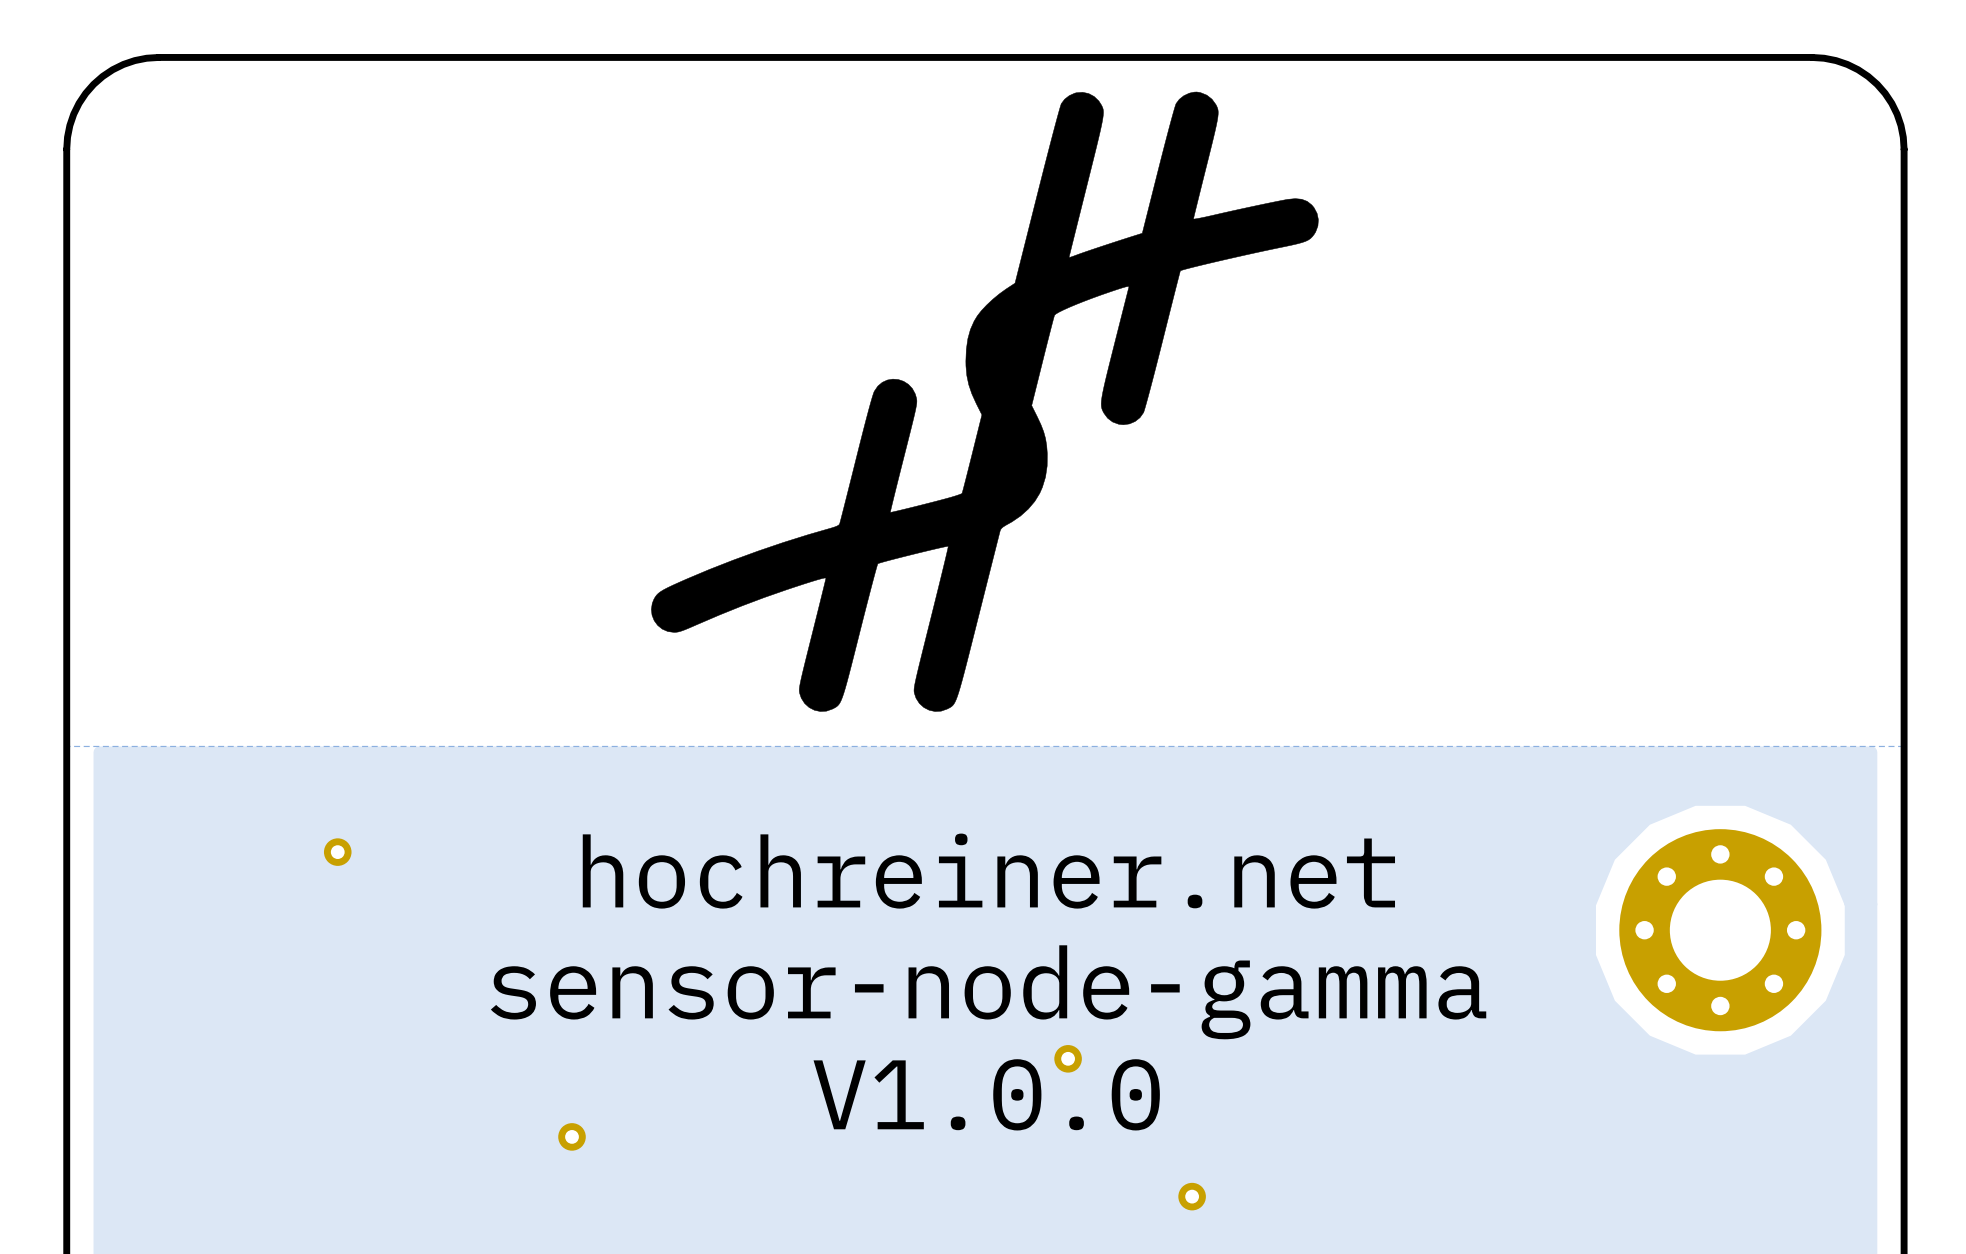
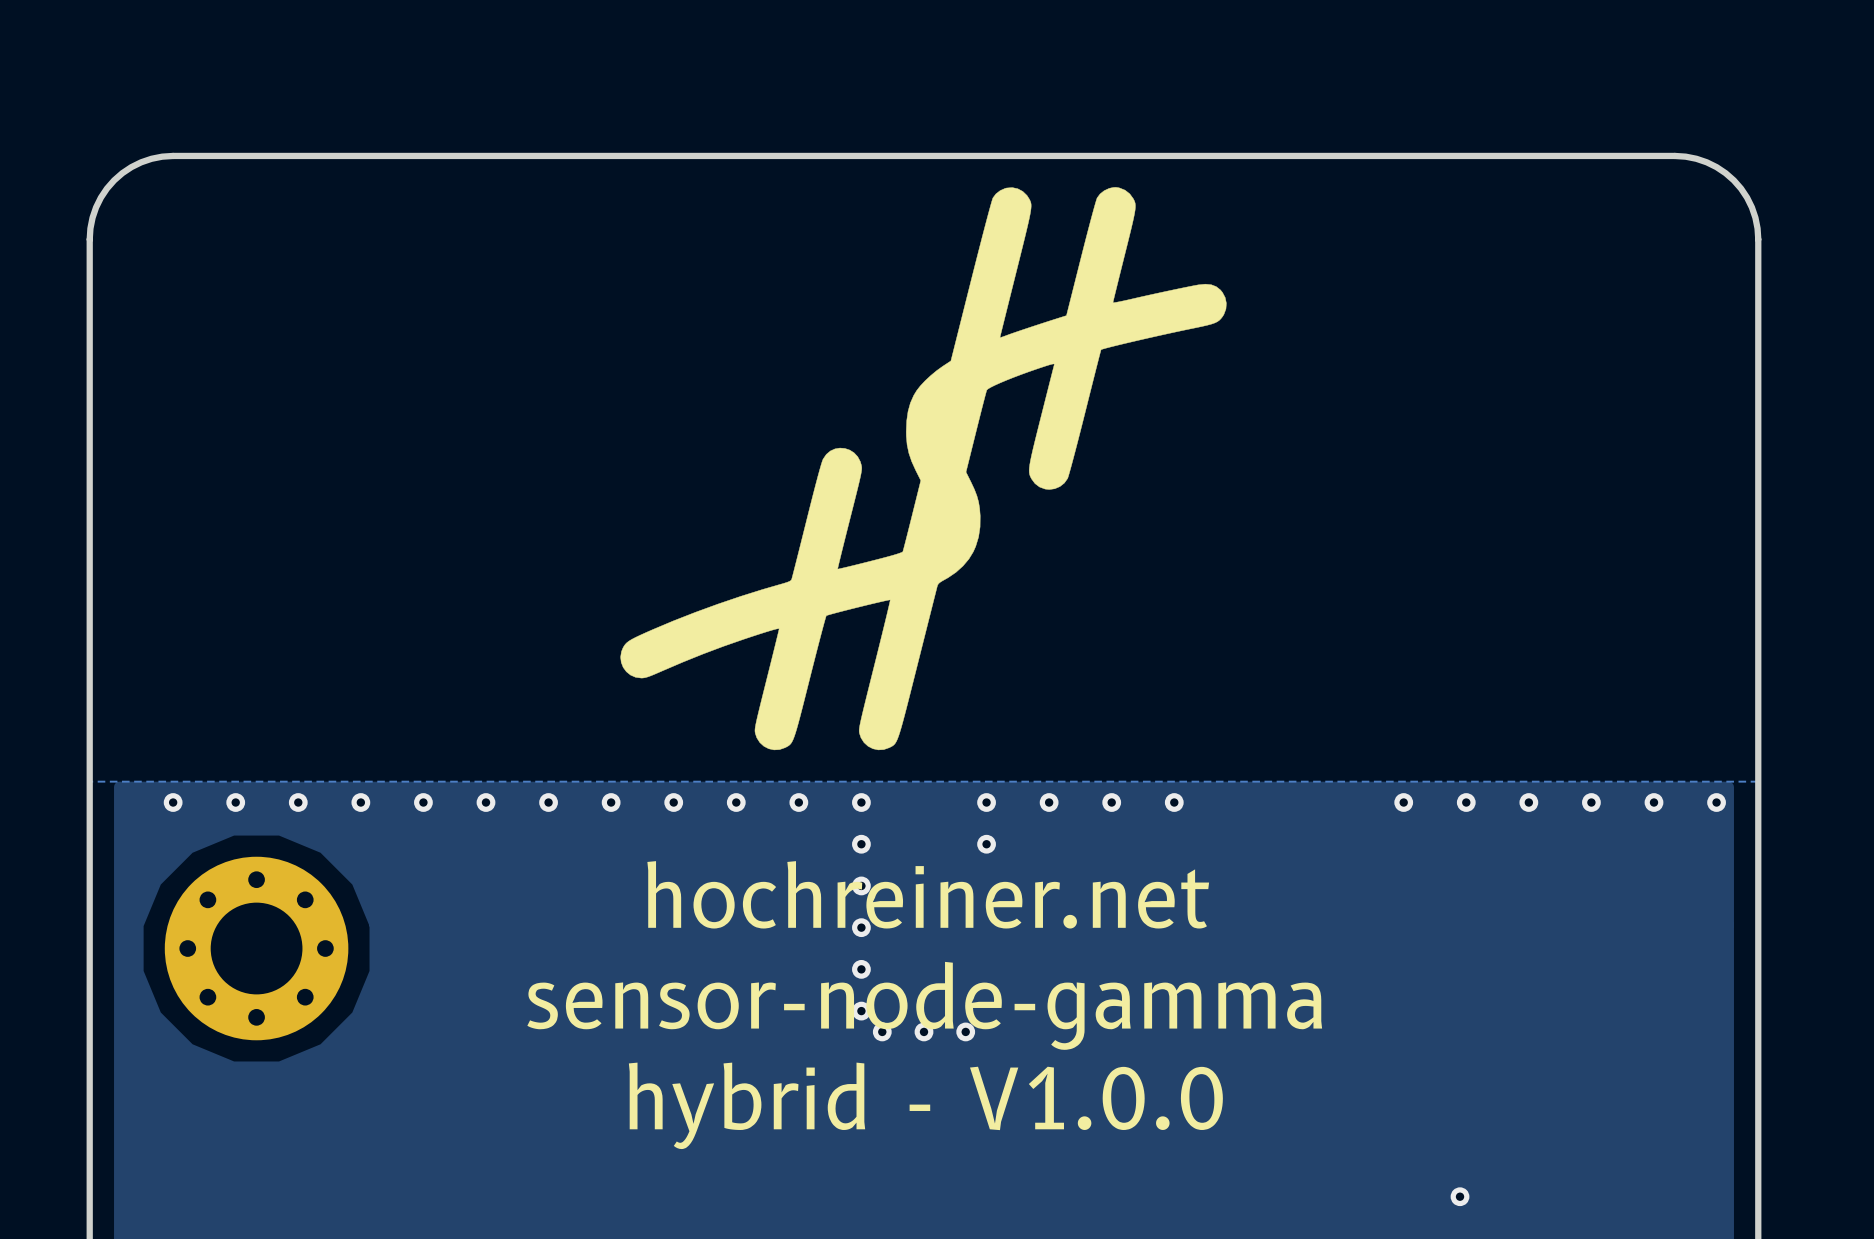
via: none -> (173, 802)
via: none -> (235, 802)
via: none -> (298, 802)
via: none -> (360, 802)
via: none -> (423, 802)
via: none -> (486, 802)
via: none -> (548, 802)
via: none -> (611, 802)
via: none -> (673, 802)
via: none -> (736, 802)
via: none -> (798, 802)
via: none -> (861, 802)
via: none -> (986, 802)
via: none -> (1049, 802)
via: none -> (1111, 802)
via: none -> (1174, 802)
via: none -> (1403, 802)
via: none -> (1466, 802)
via: none -> (1528, 802)
via: none -> (1591, 802)
via: none -> (1653, 802)
via: none -> (1716, 802)
via: none -> (861, 844)
via: none -> (986, 844)
part: (337, 852) -> none
via: none -> (861, 885)
via: none -> (861, 927)
part: none -> (256, 948)
part: (1720, 930) -> none
via: none -> (861, 969)
via: none -> (861, 1011)
via: none -> (882, 1031)
via: none -> (923, 1031)
via: none -> (965, 1031)
part: (1068, 1058) -> none
text: V1.0.0 (986, 1094) -> hybrid - V1.0.0 (925, 1105)
part: (572, 1136) -> none
part: (1192, 1196) -> none
via: none -> (1460, 1196)

